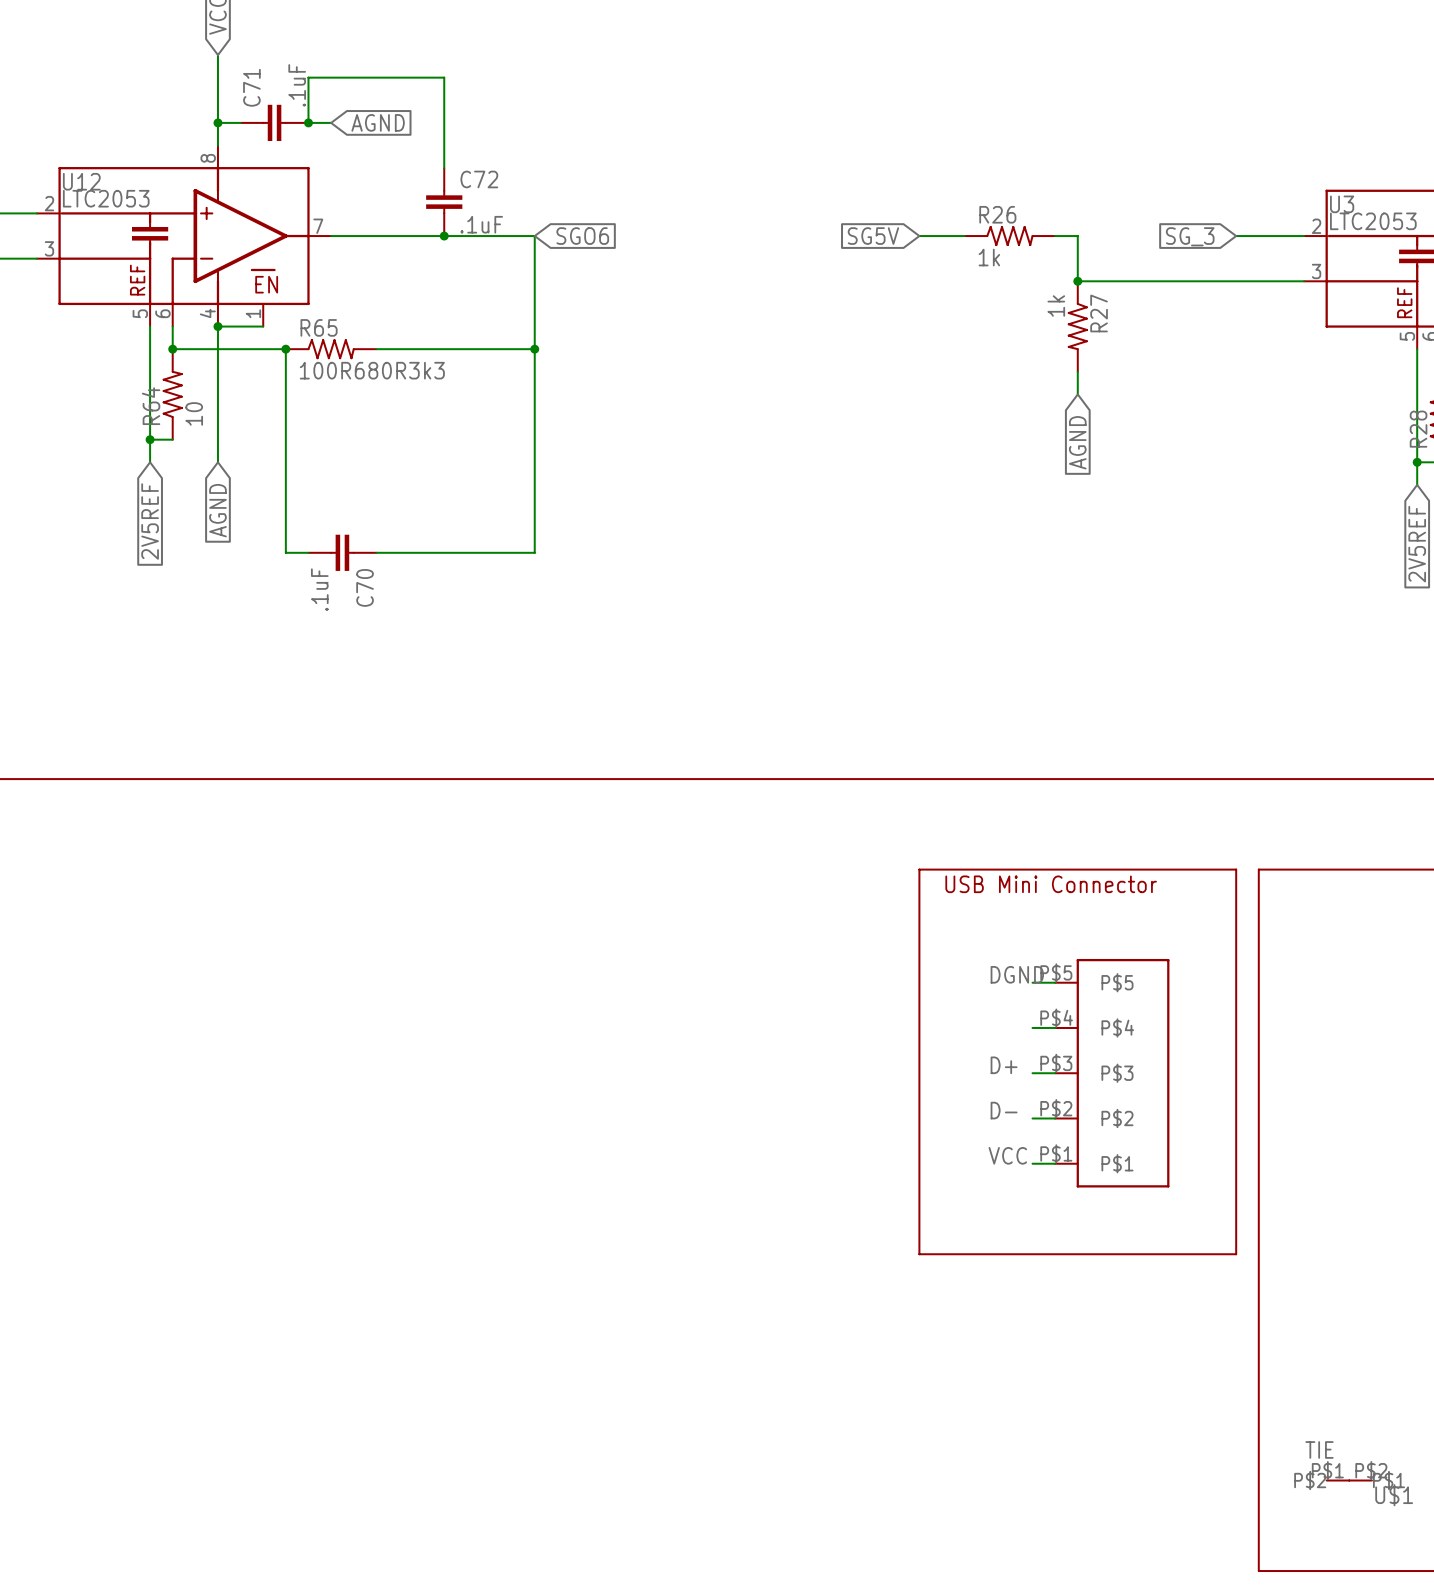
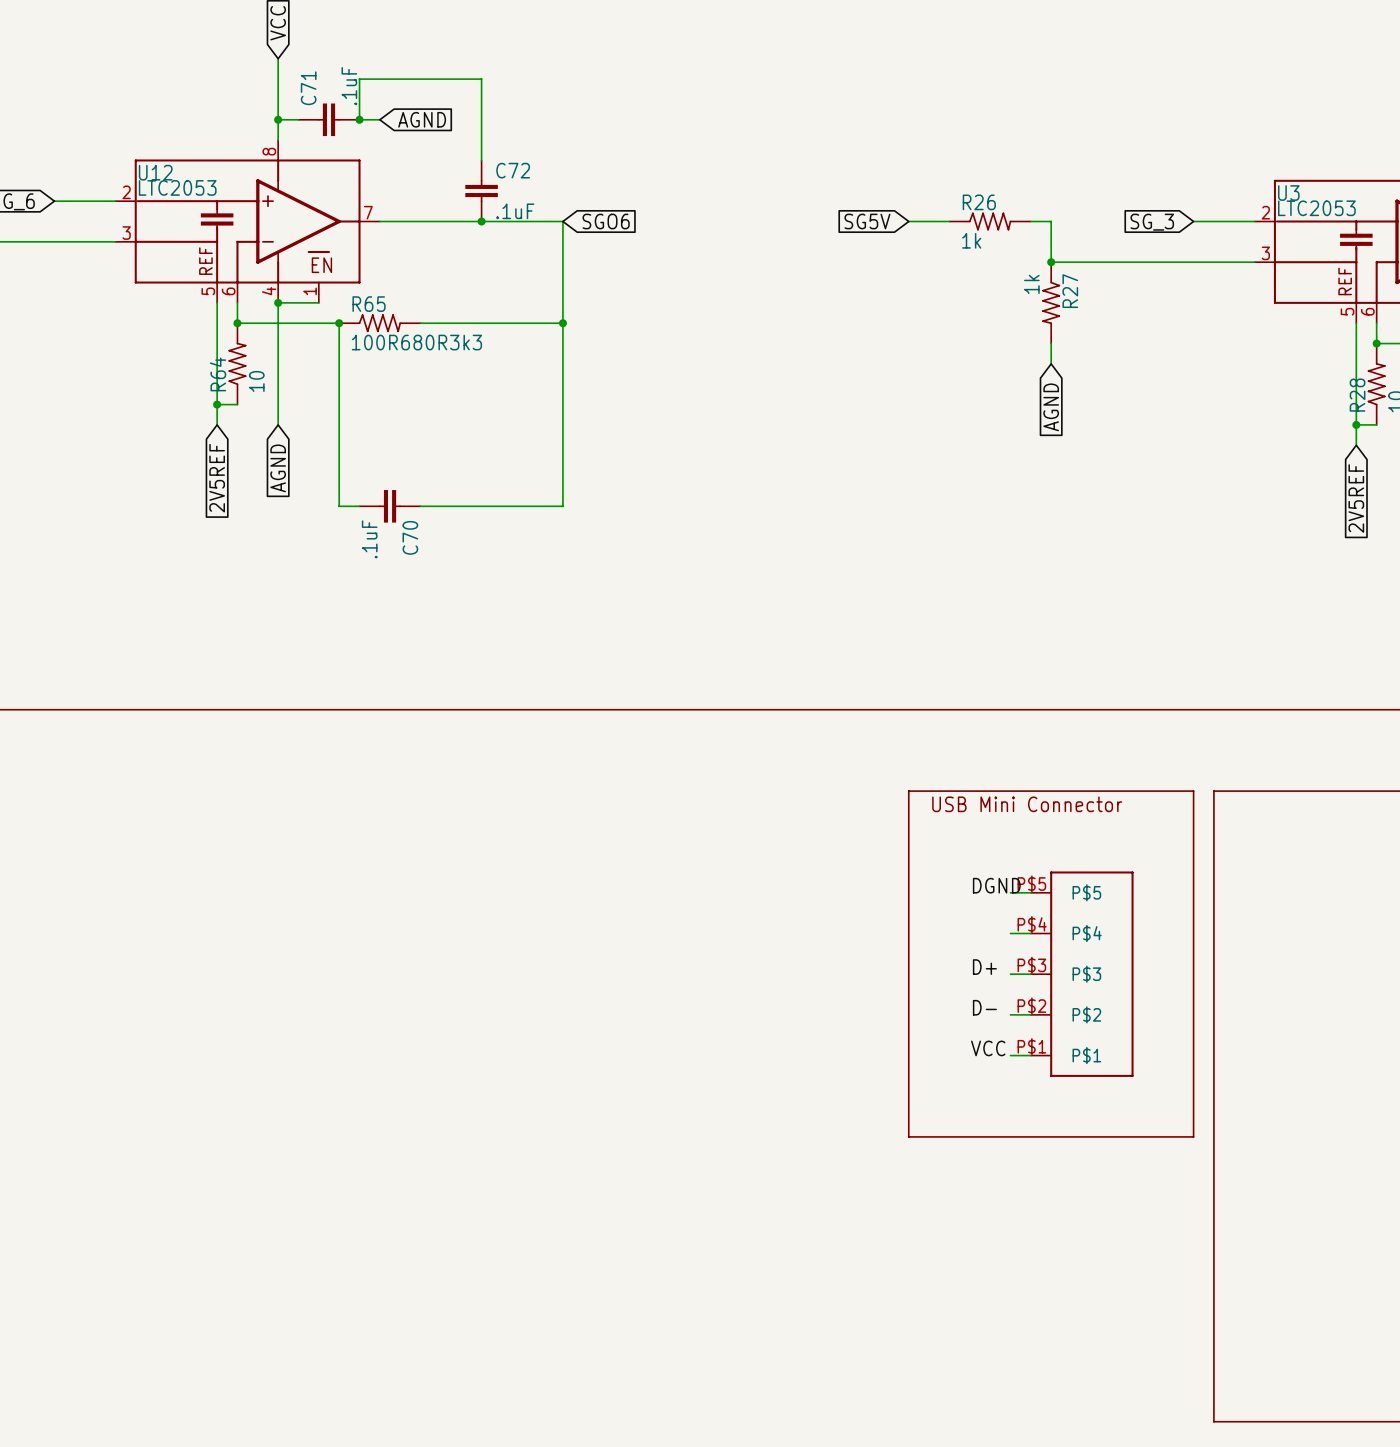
U$1: TIE (1349, 1480) -> none

